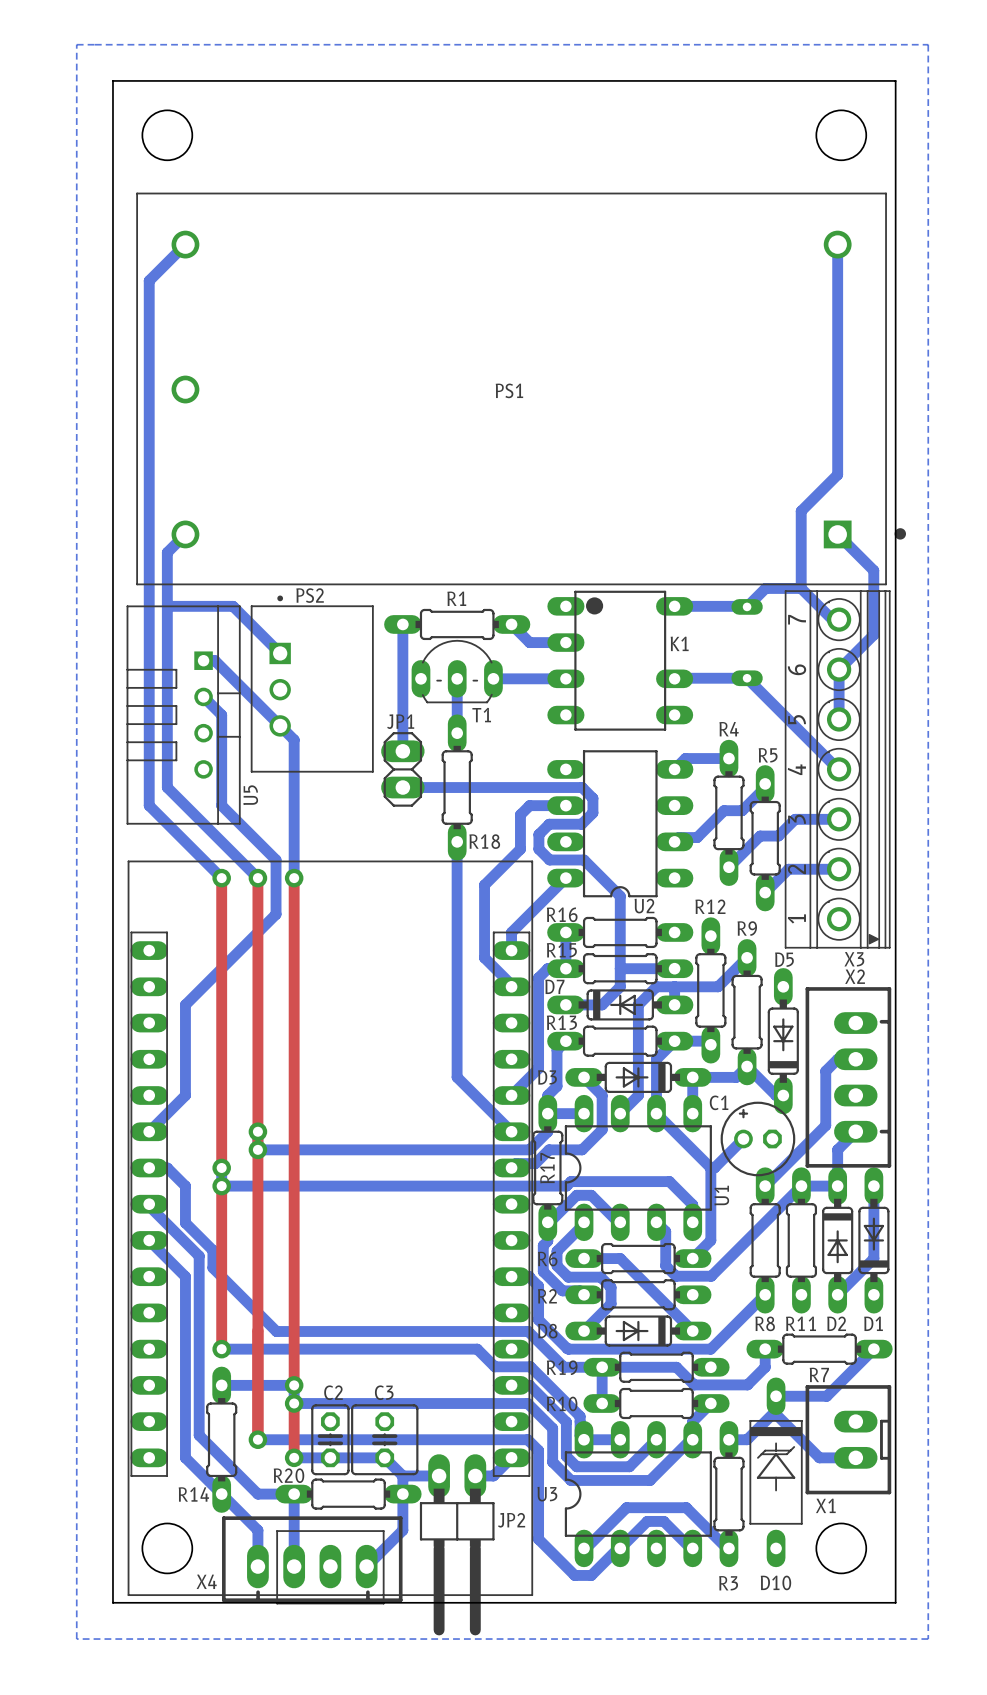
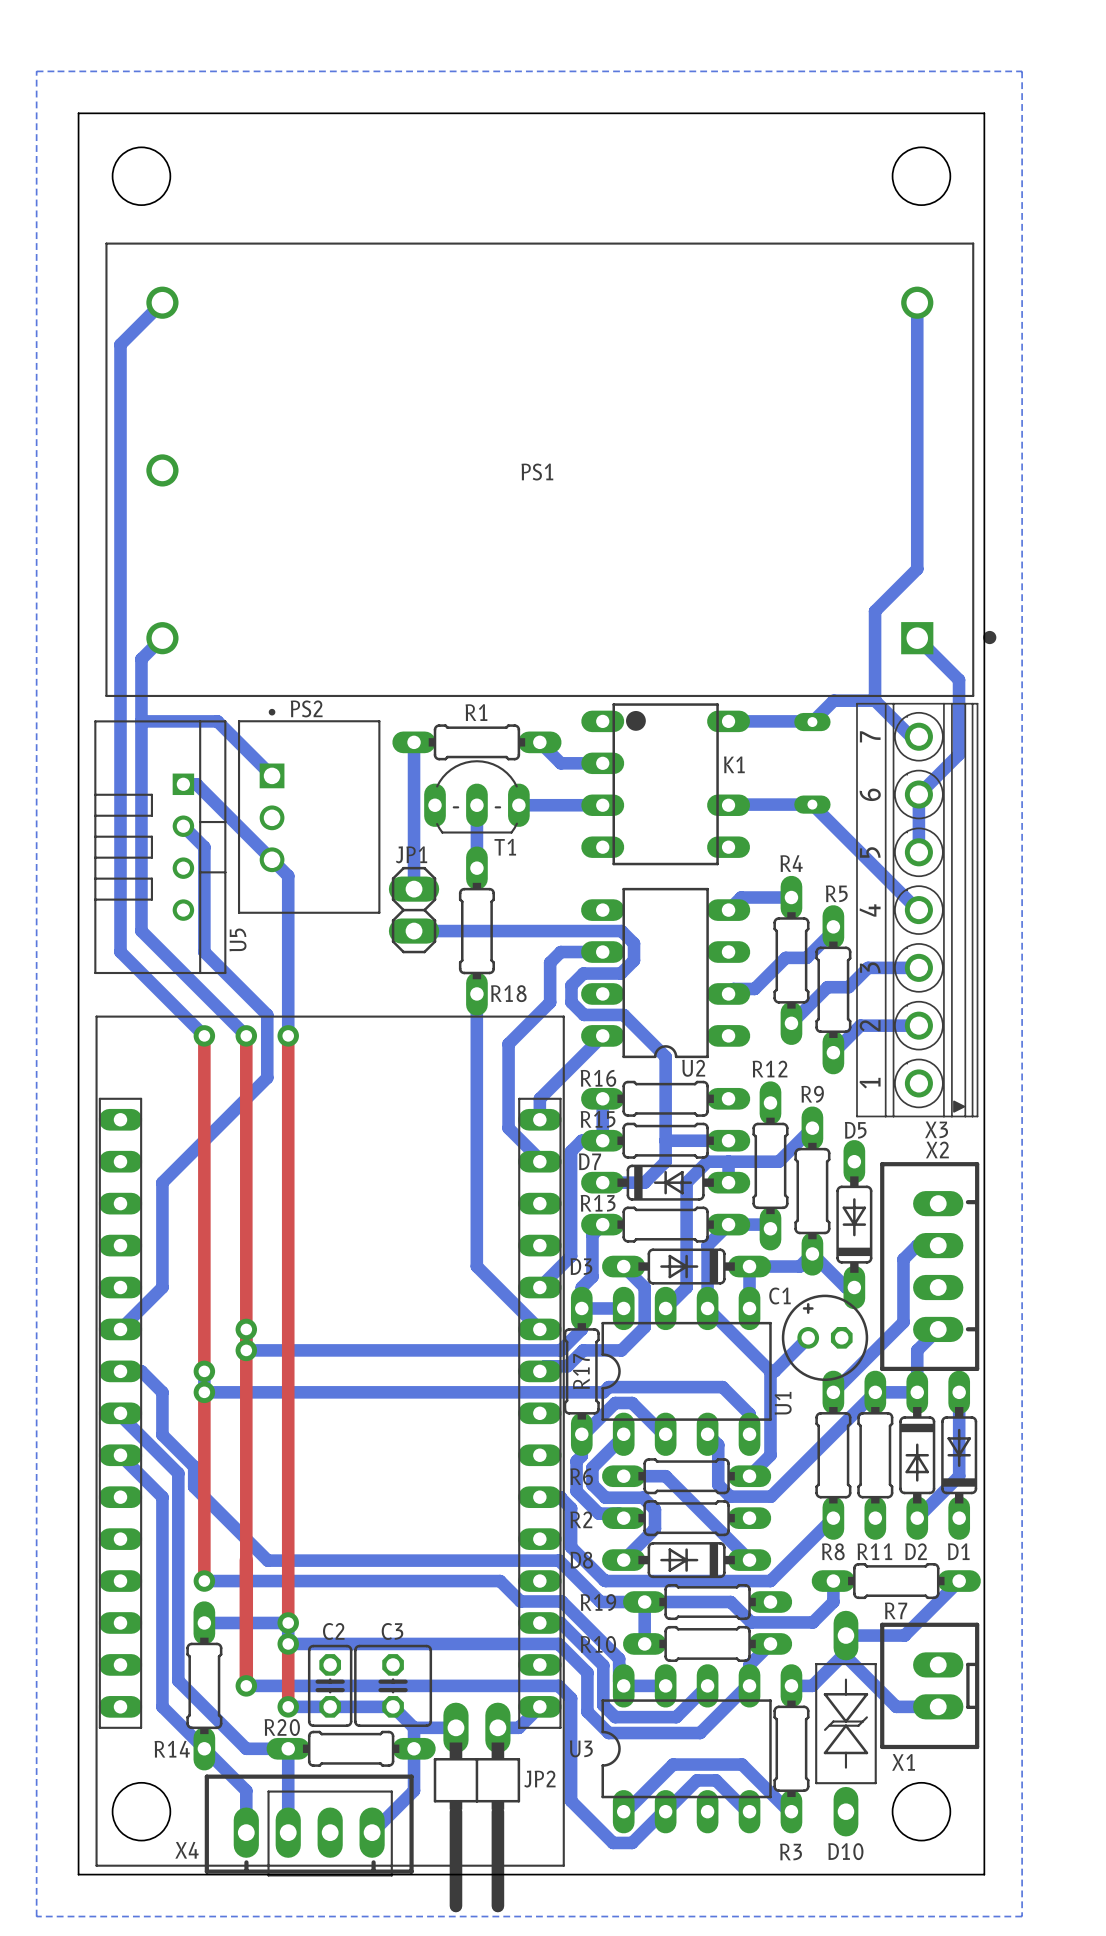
D10 footprint: [749, 1377, 803, 1568] -> [815, 1610, 877, 1837]

